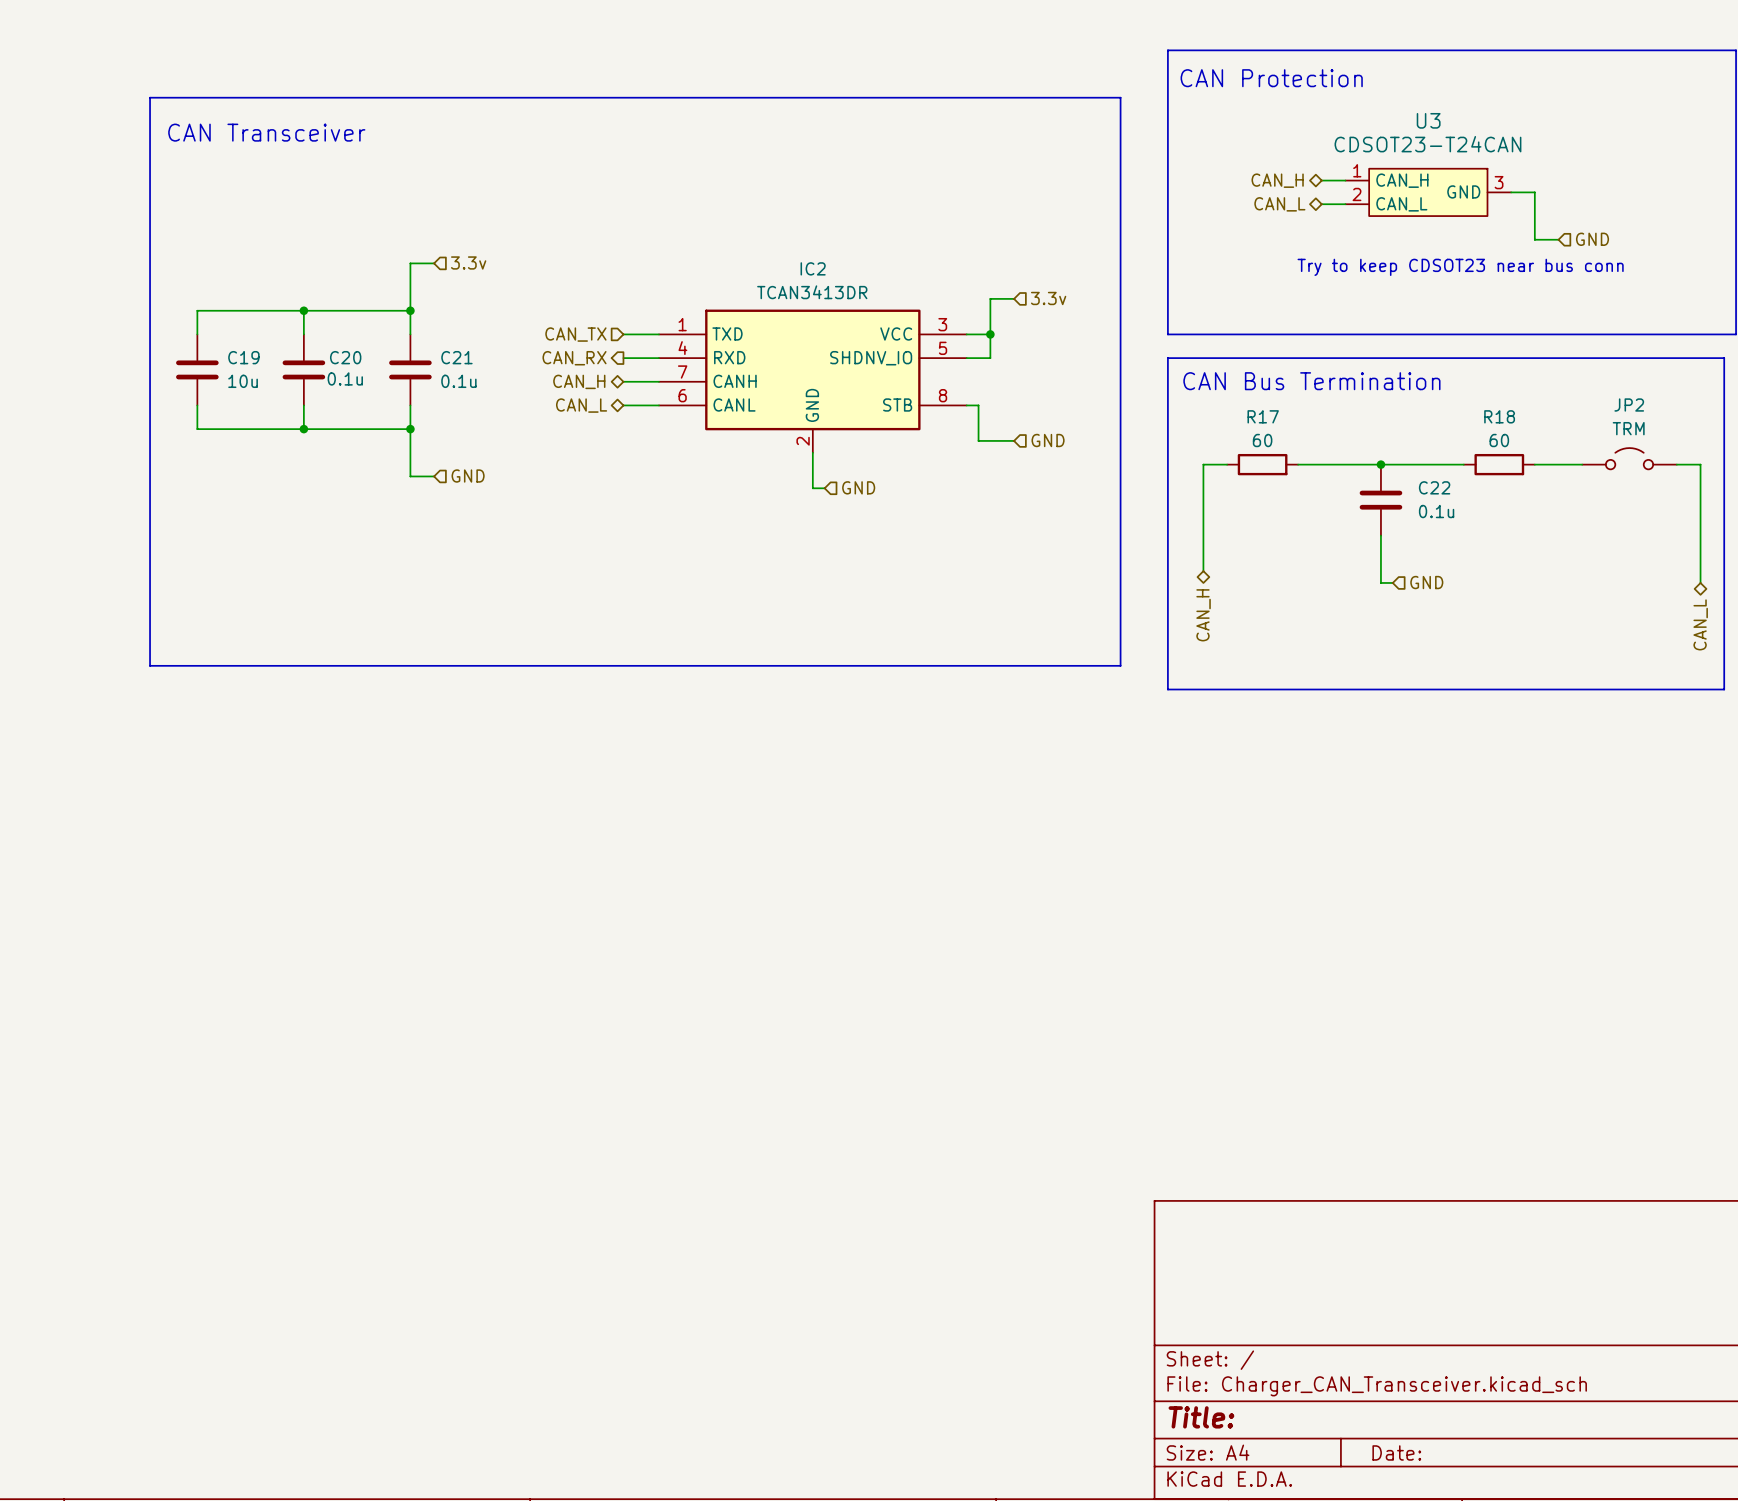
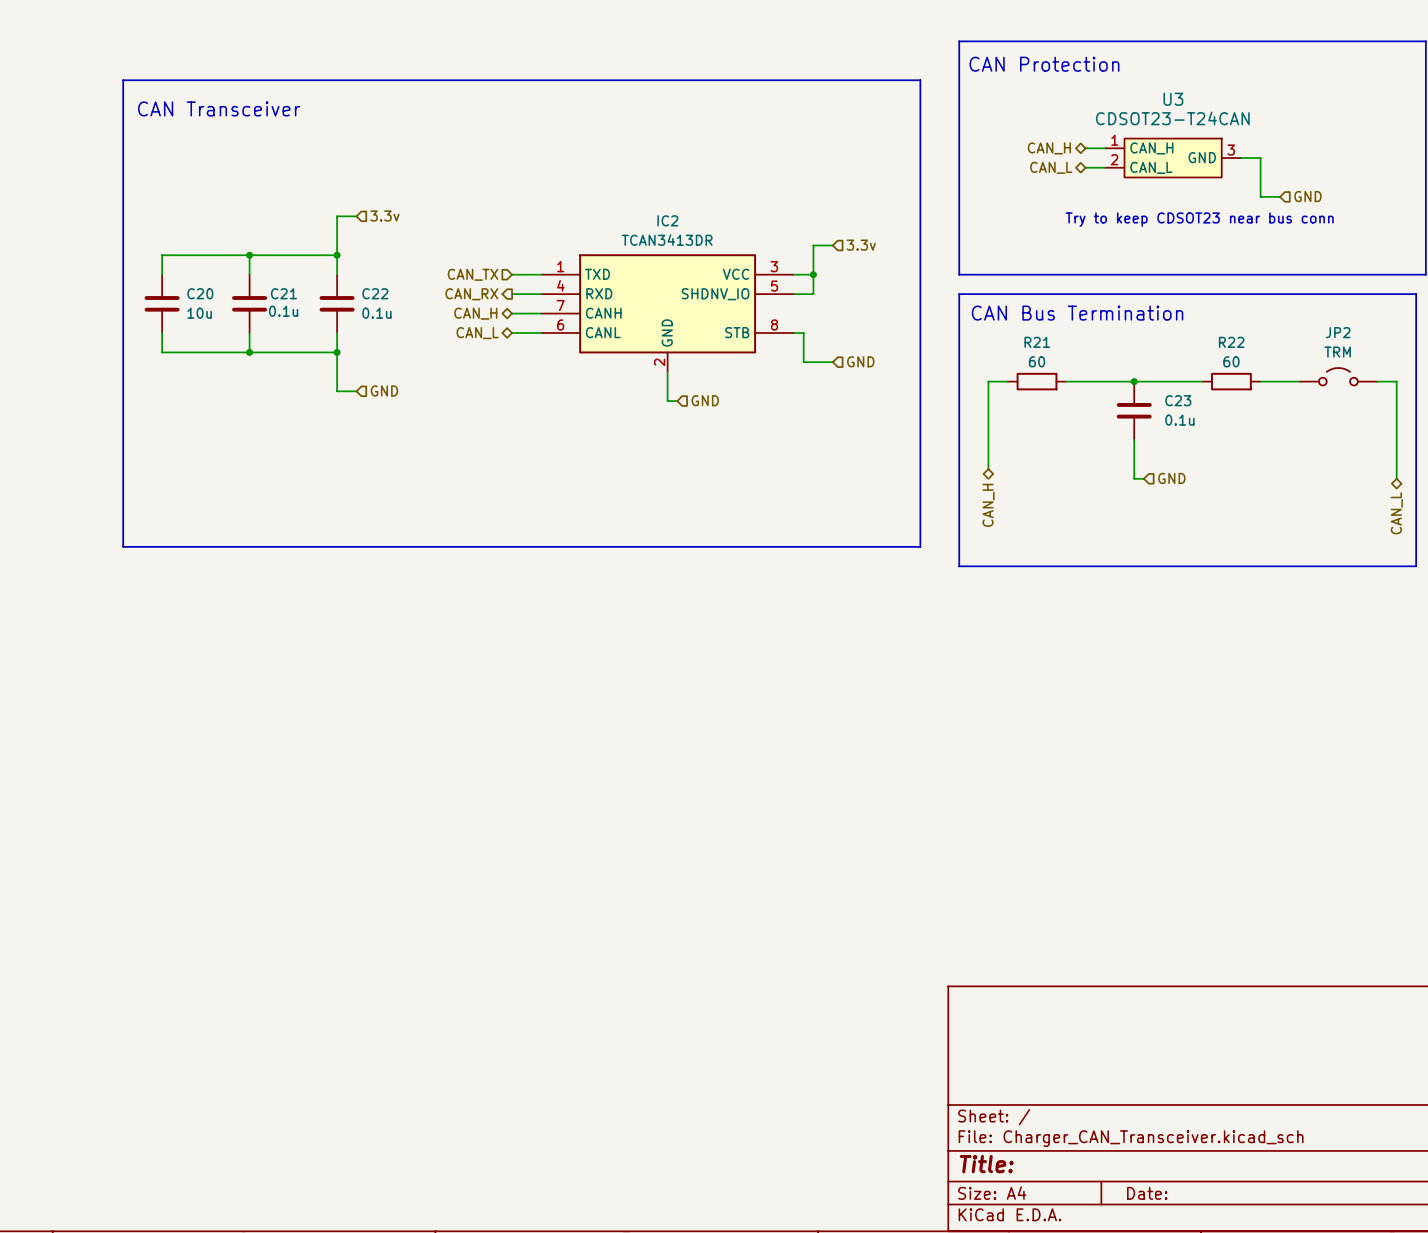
C19 name: C19 (243, 357) -> C20 (200, 293)
C20 name: C20 (345, 357) -> C21 (283, 293)
C21 name: C21 (456, 357) -> C22 (375, 293)
R17 name: R17 (1263, 416) -> R21 (1037, 342)
R18 name: R18 (1499, 416) -> R22 (1231, 342)
C22 name: C22 (1434, 487) -> C23 (1178, 400)

